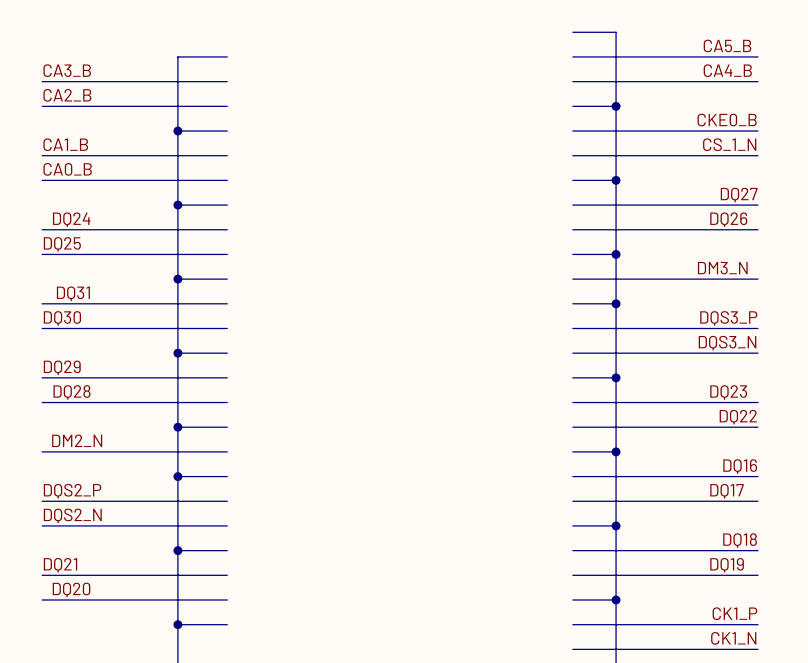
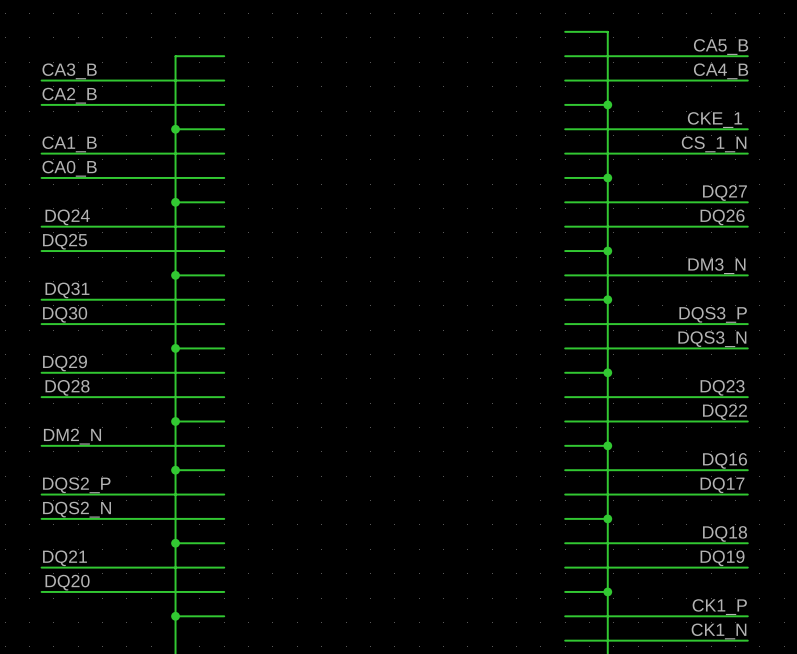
label: CKE0_B (727, 120) -> CKE_1 (714, 120)

